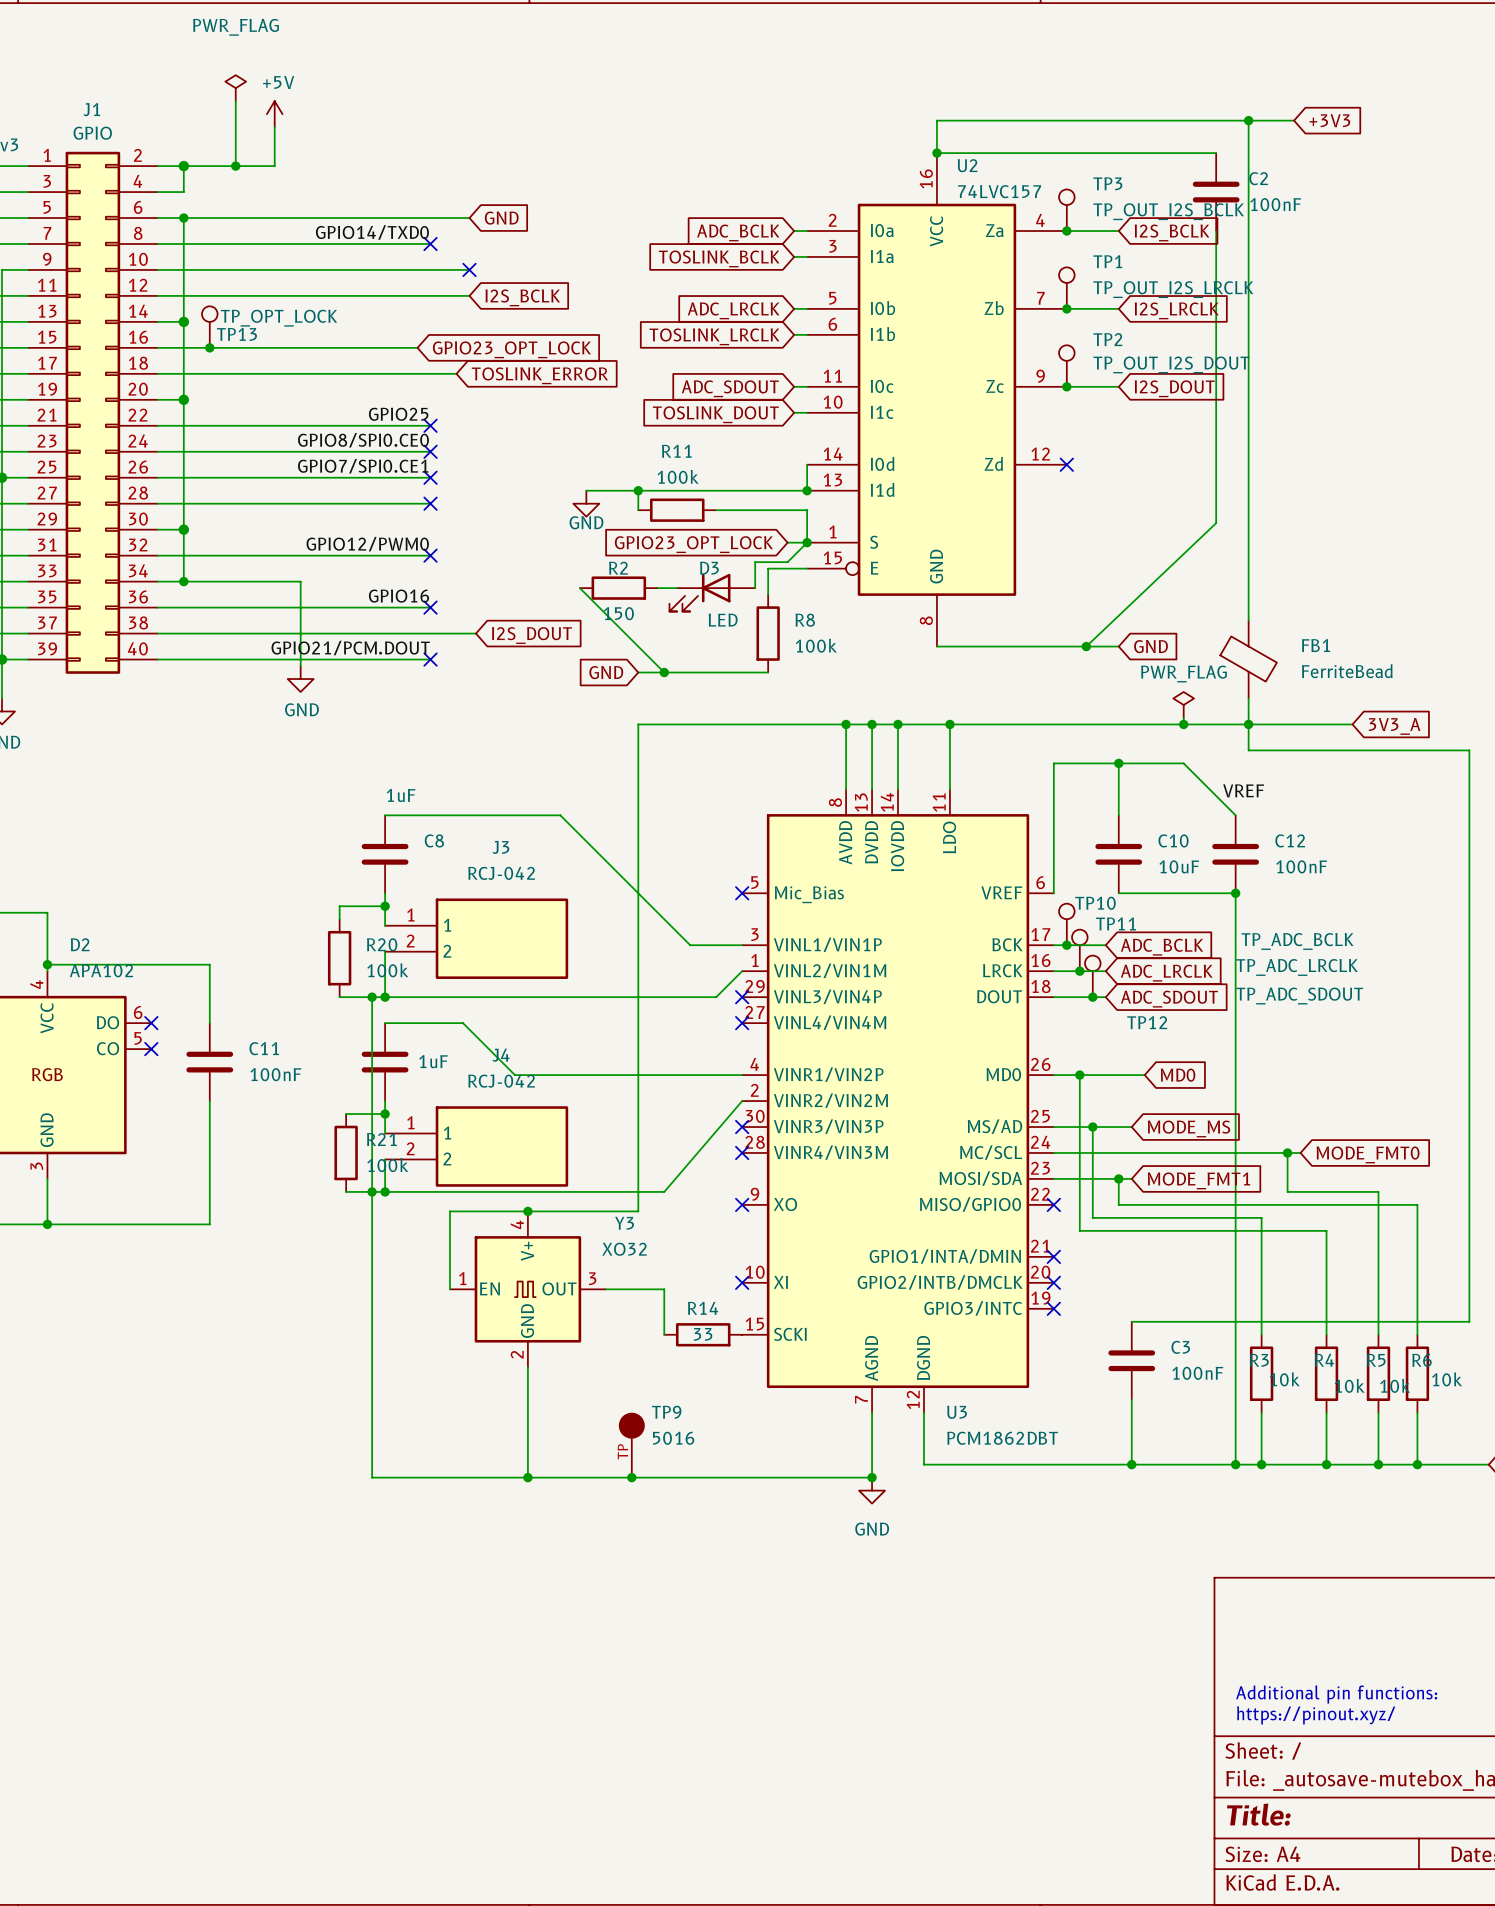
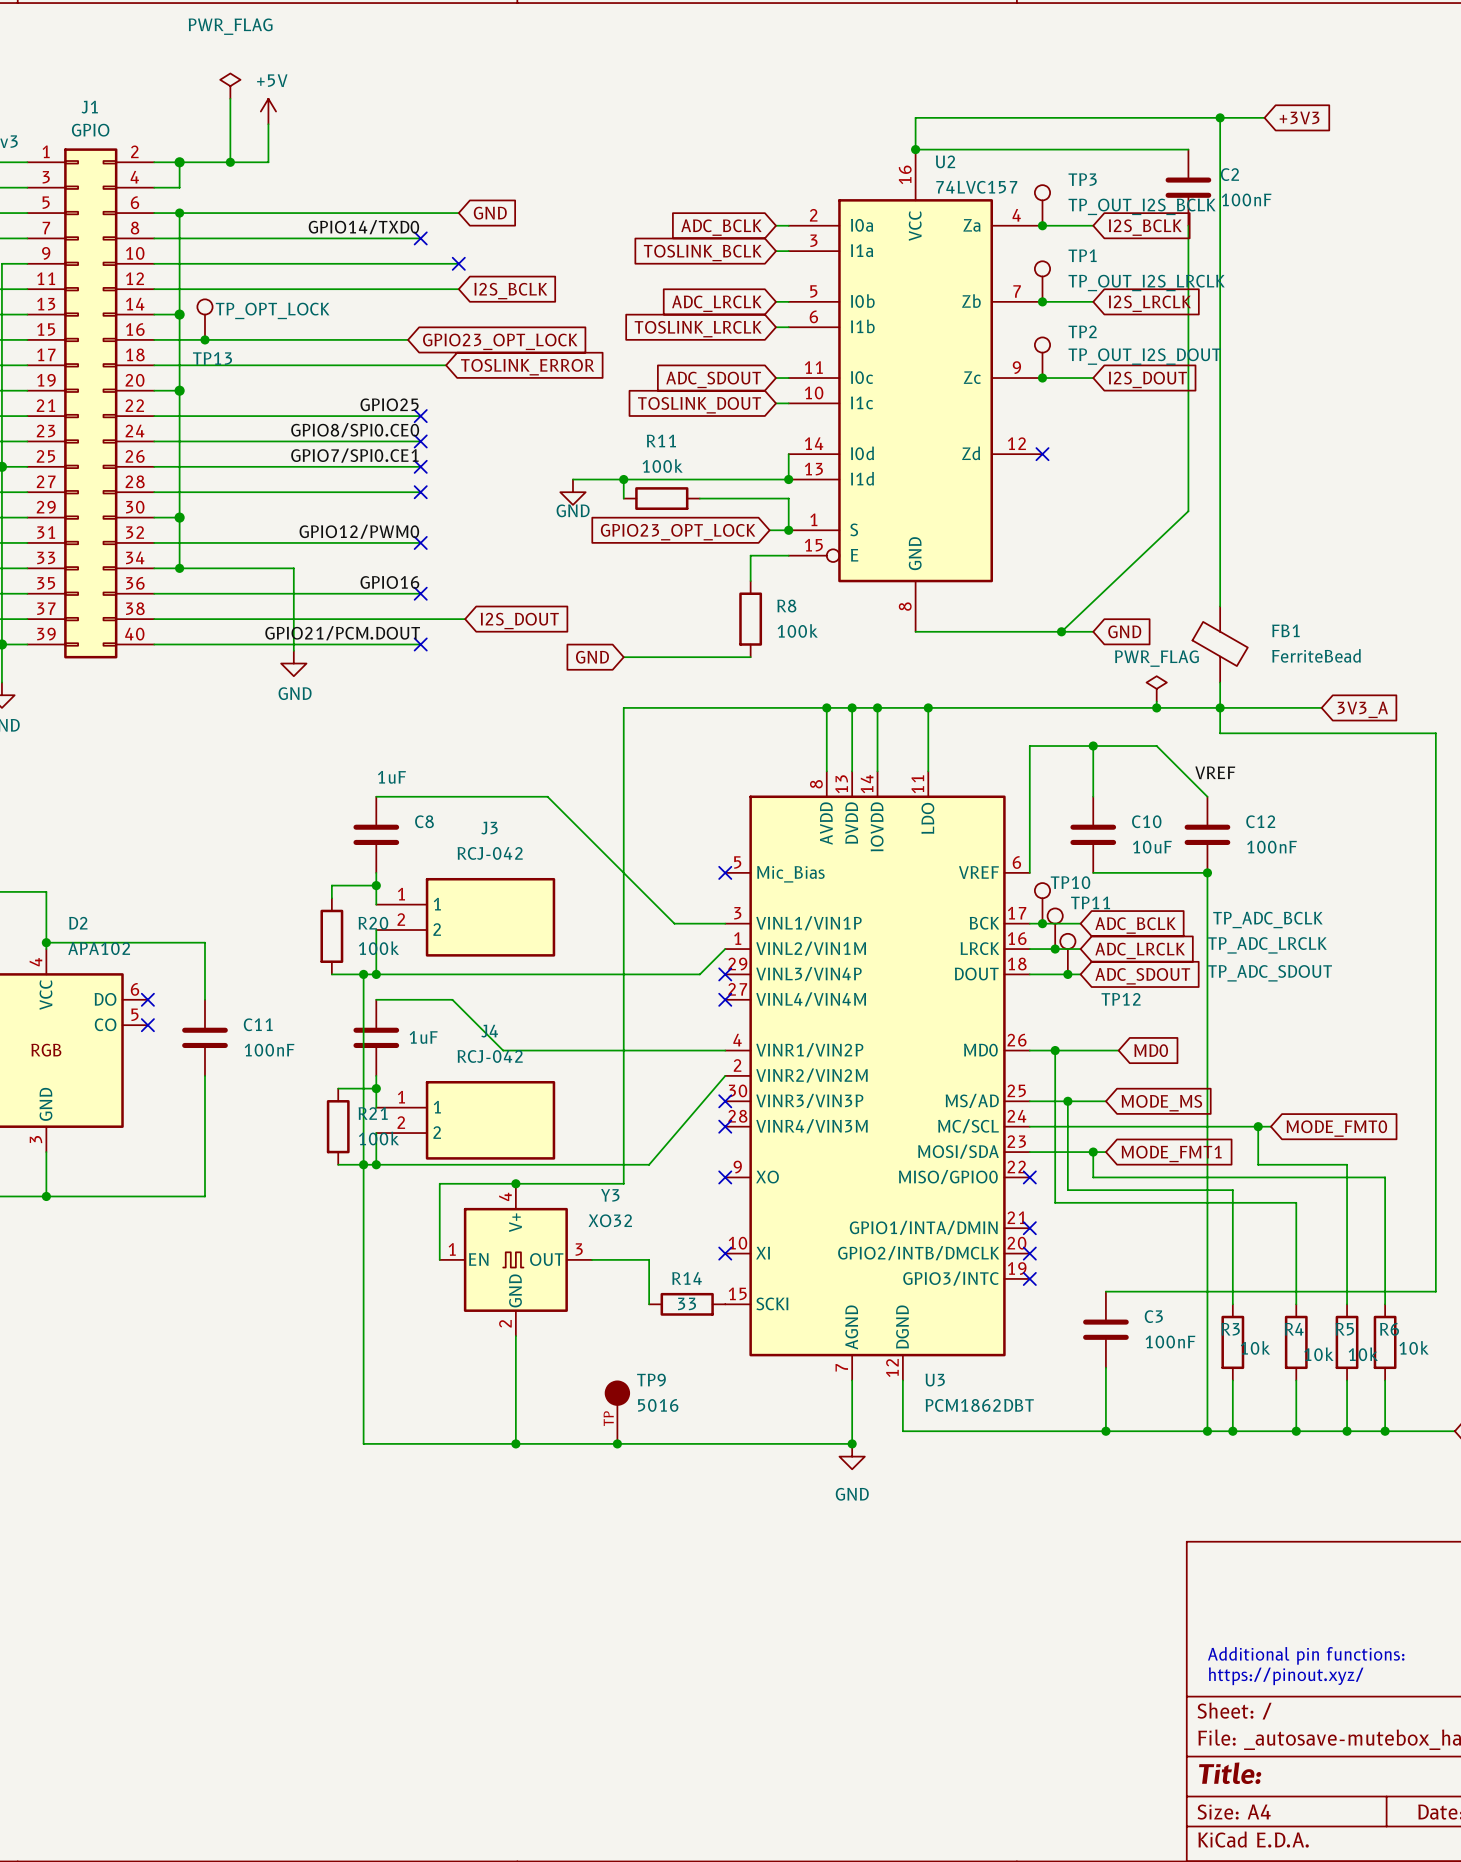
TP13 name position: TP13 (236, 334) -> TP13 (212, 358)
wire: (807, 542) (787, 562) (755, 562) (755, 588) -> none
wire: (579, 588) (664, 672) -> none
R2: 150 (618, 588) -> none
wire: (657, 588) (677, 588) -> none
D3: LED (712, 592) -> none
junction: (664, 672) -> none

